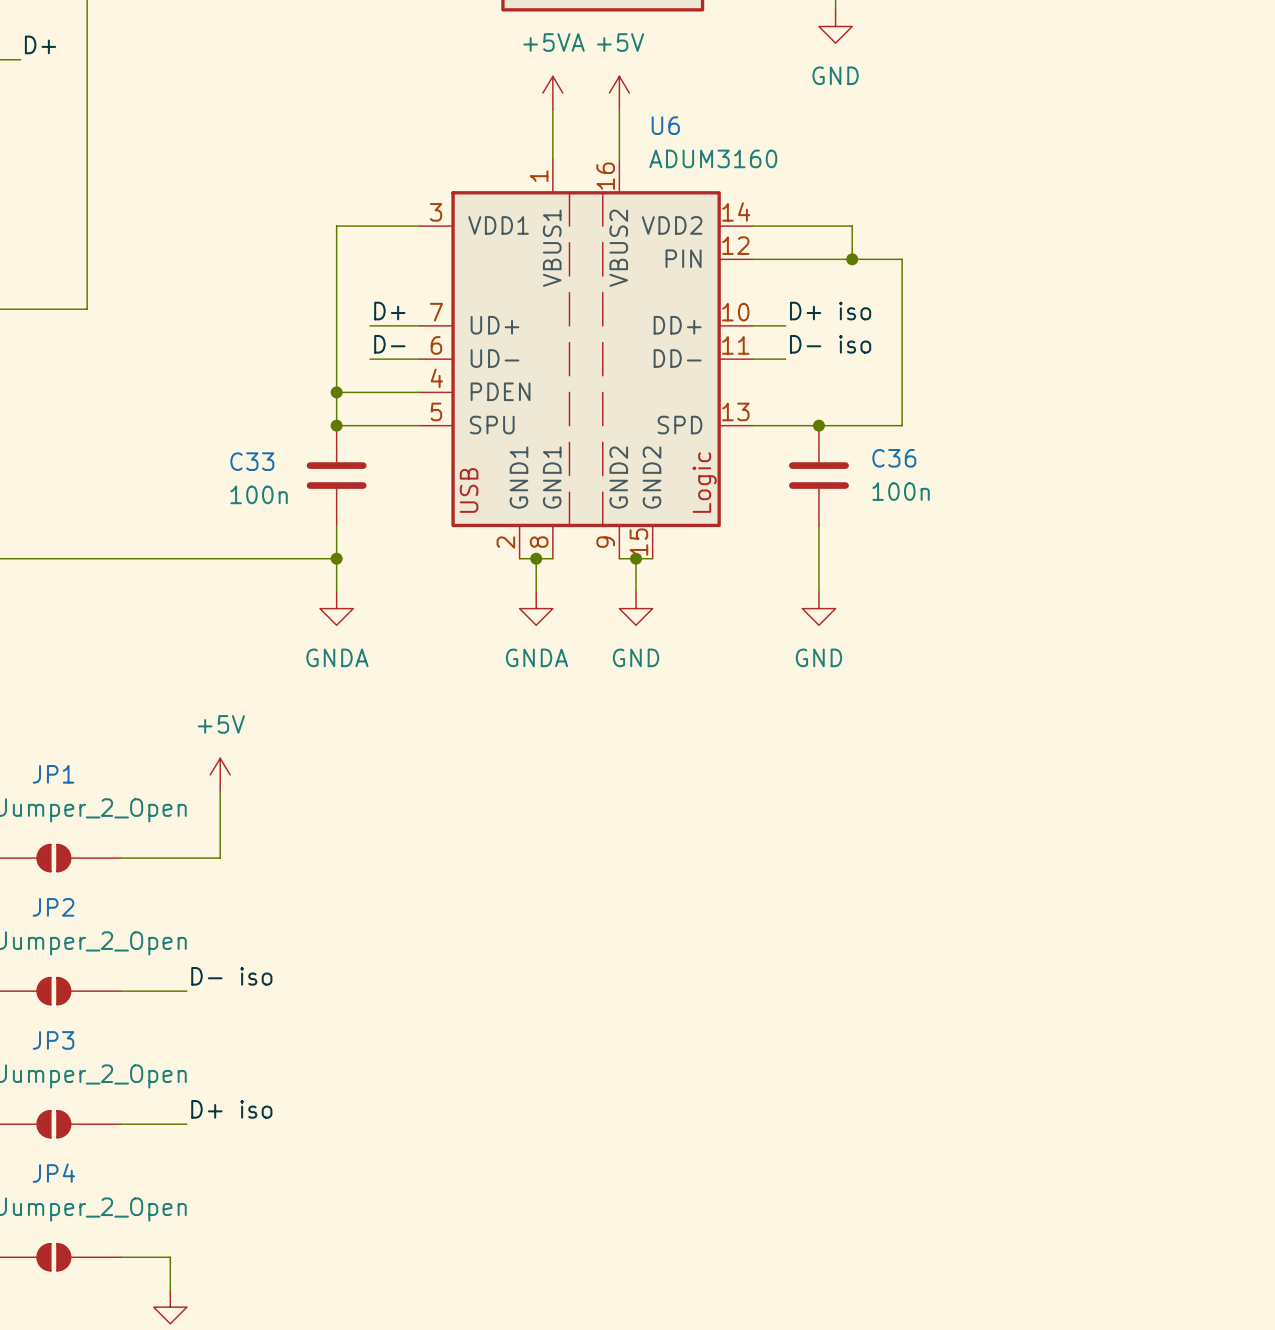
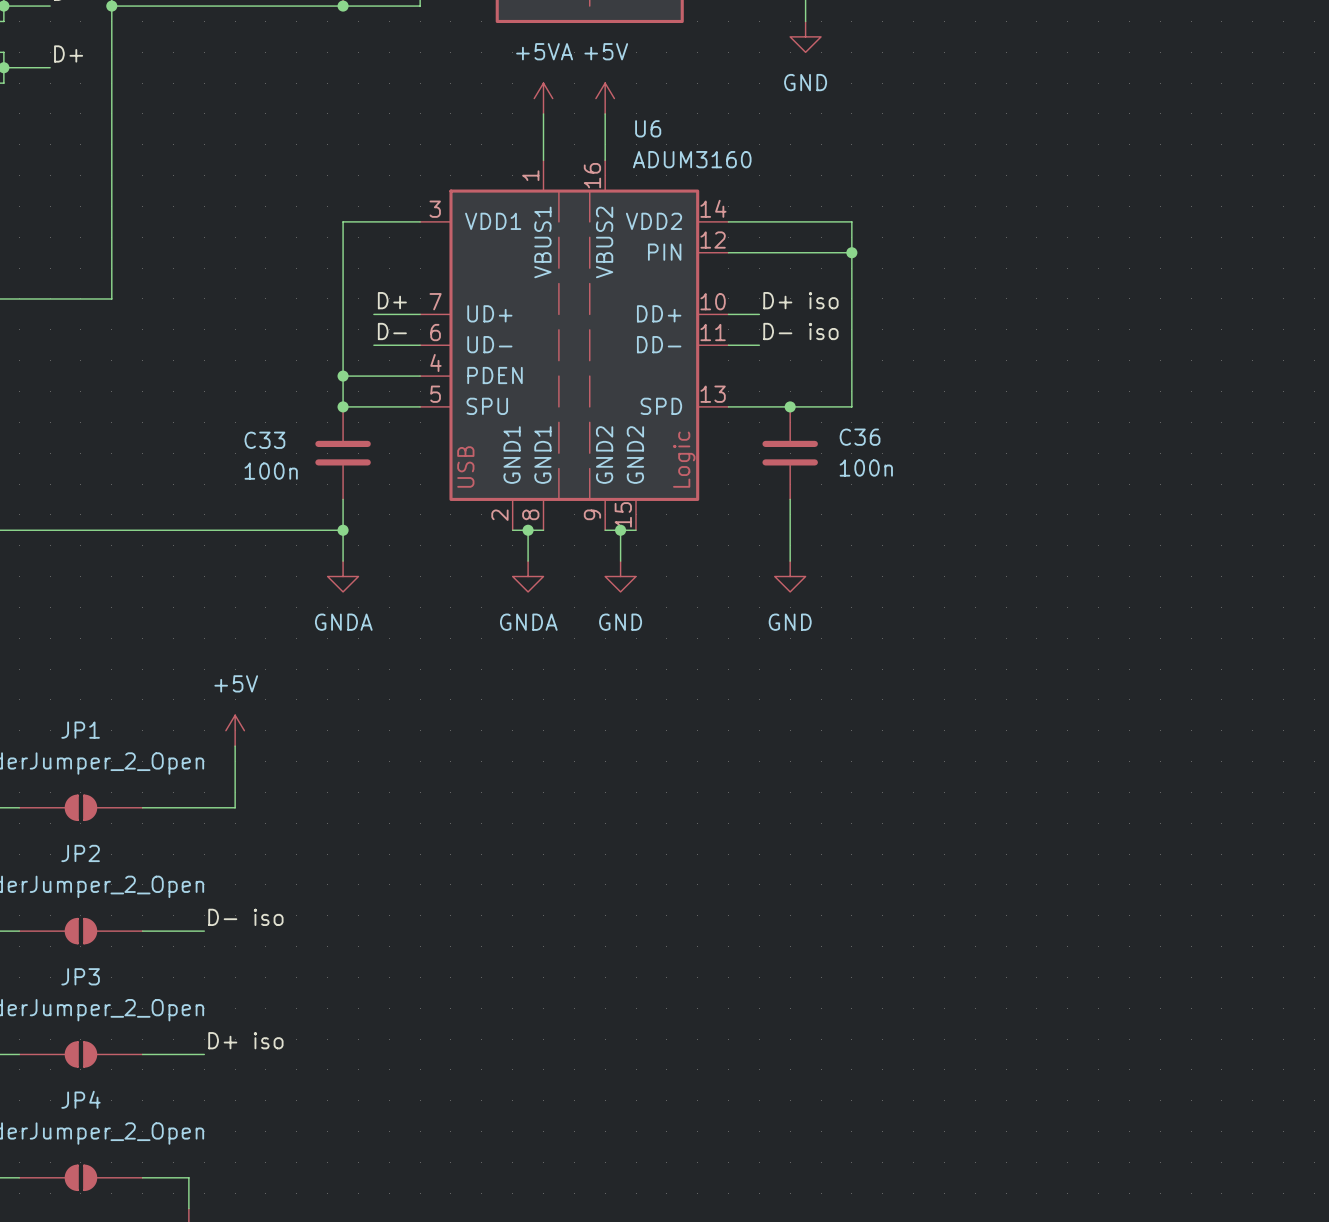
wire: (852, 226) (852, 259) -> none
junction position: (852, 259) -> (851, 252)
wire: (885, 259) (902, 259) (902, 425) (885, 425) -> (821, 221) (851, 221) (851, 406)

